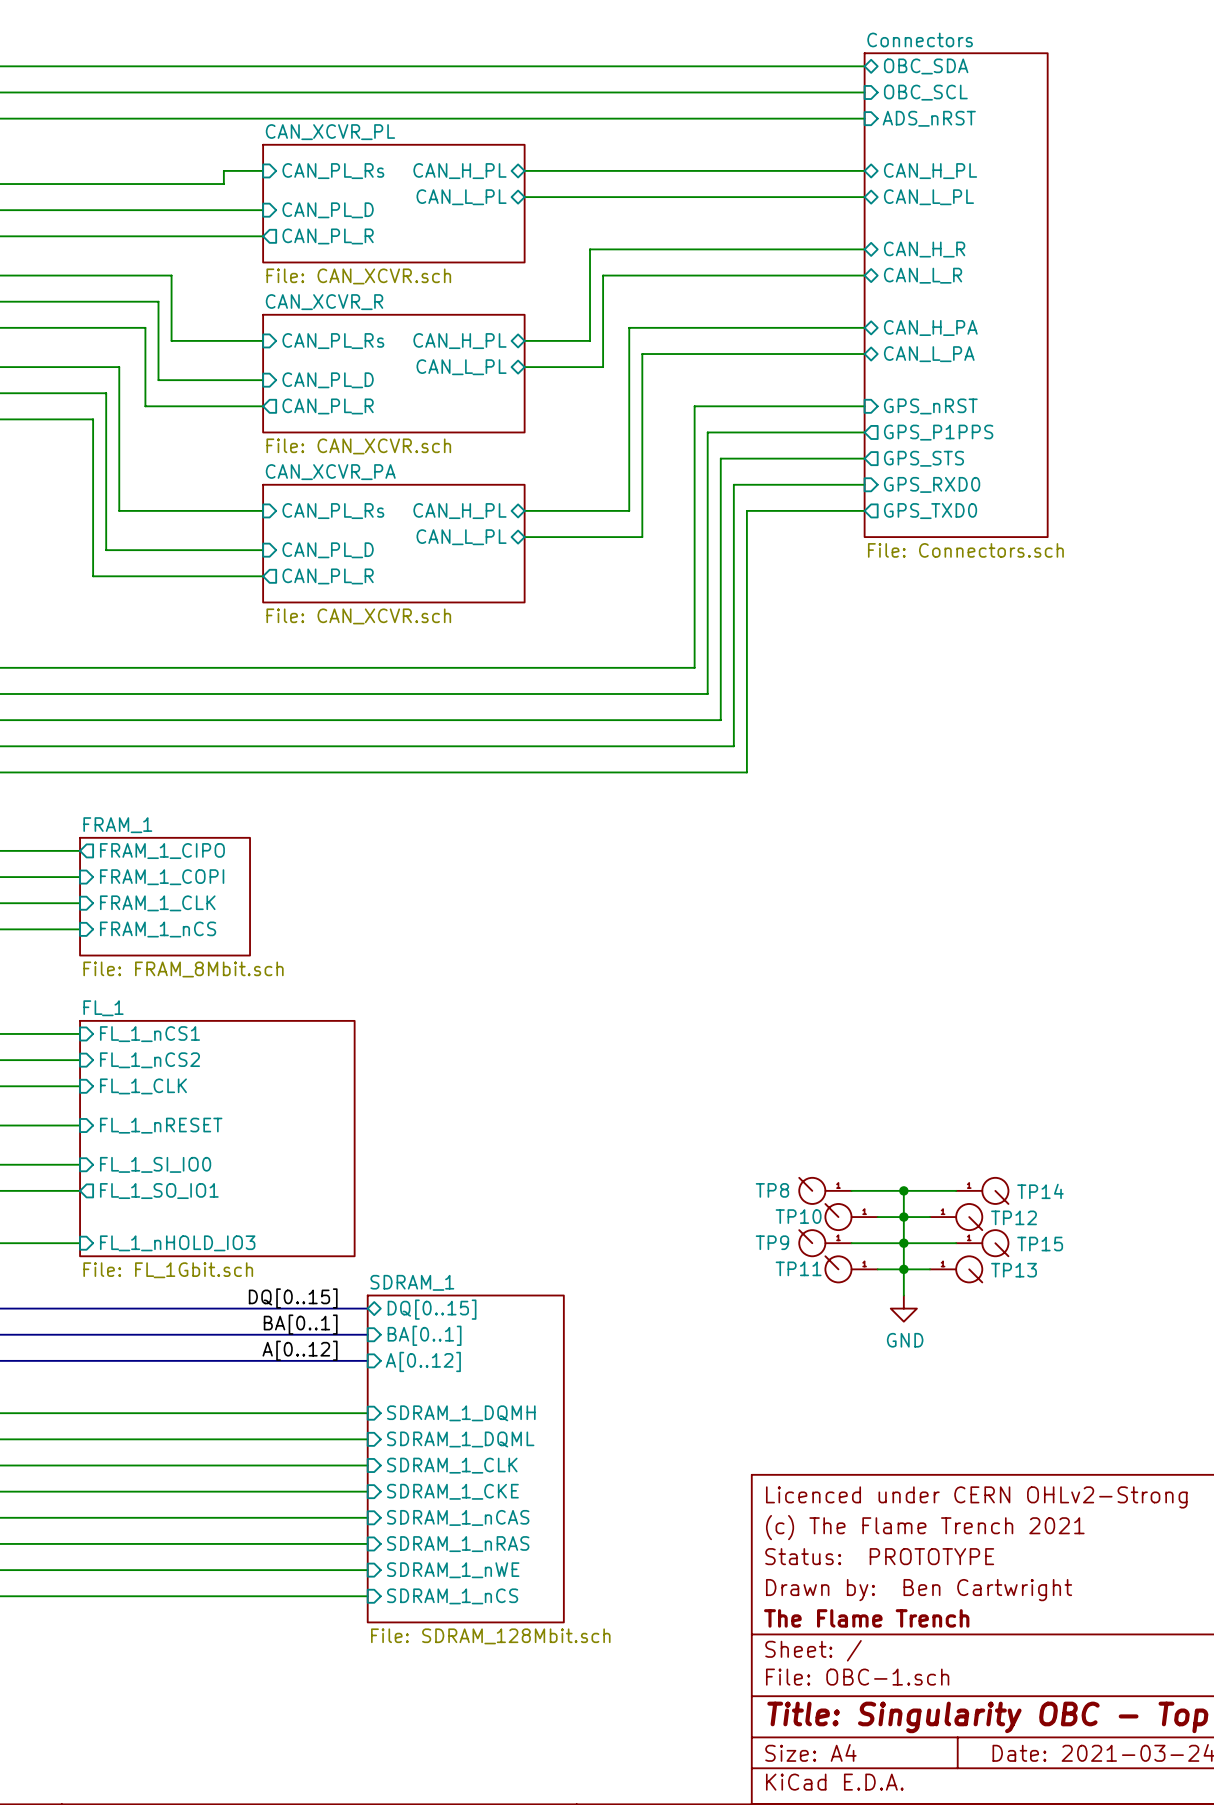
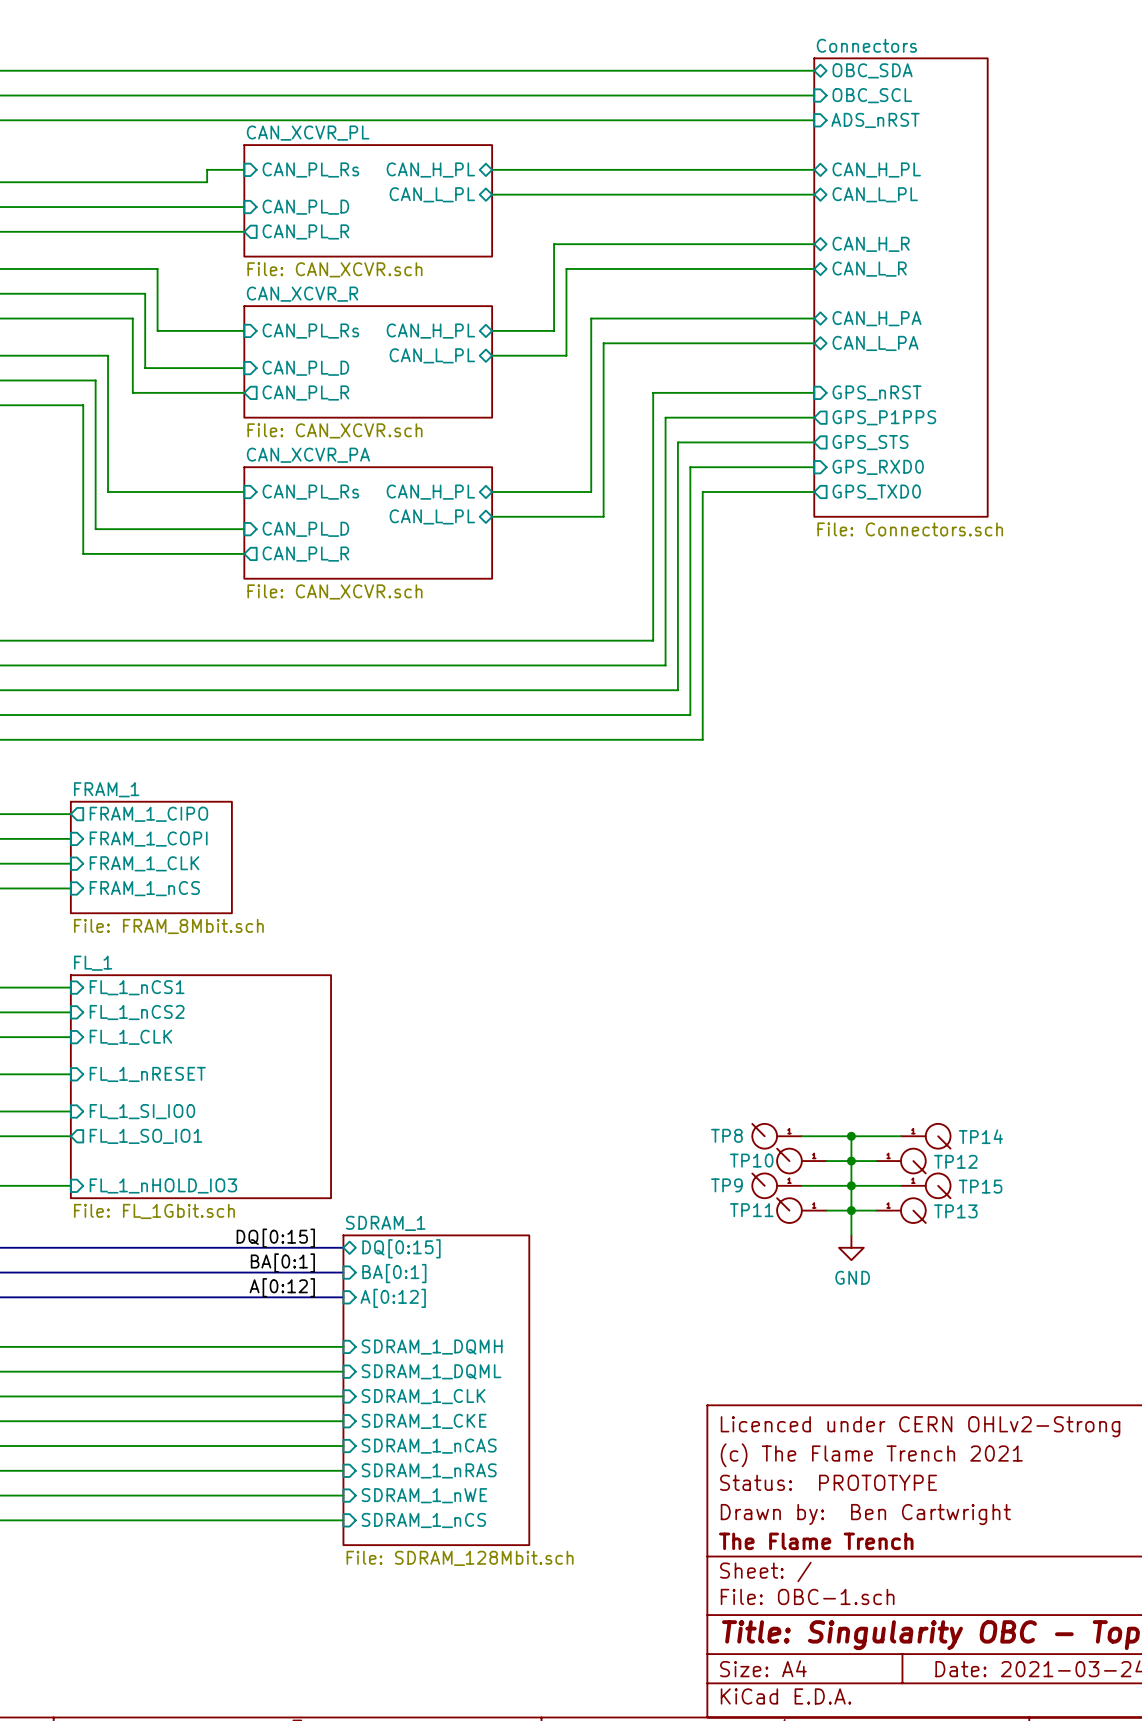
label: DQ[0..15] (293, 1298) -> DQ[0:15] (275, 1238)
sheet pin: DQ[0..15] (432, 1309) -> DQ[0:15] (401, 1248)
label: BA[0..1] (300, 1324) -> BA[0:1] (282, 1262)
sheet pin: BA[0..1] (424, 1335) -> BA[0:1] (394, 1273)
label: A[0..12] (300, 1350) -> A[0:12] (282, 1287)
sheet pin: A[0..12] (423, 1361) -> A[0:12] (393, 1298)

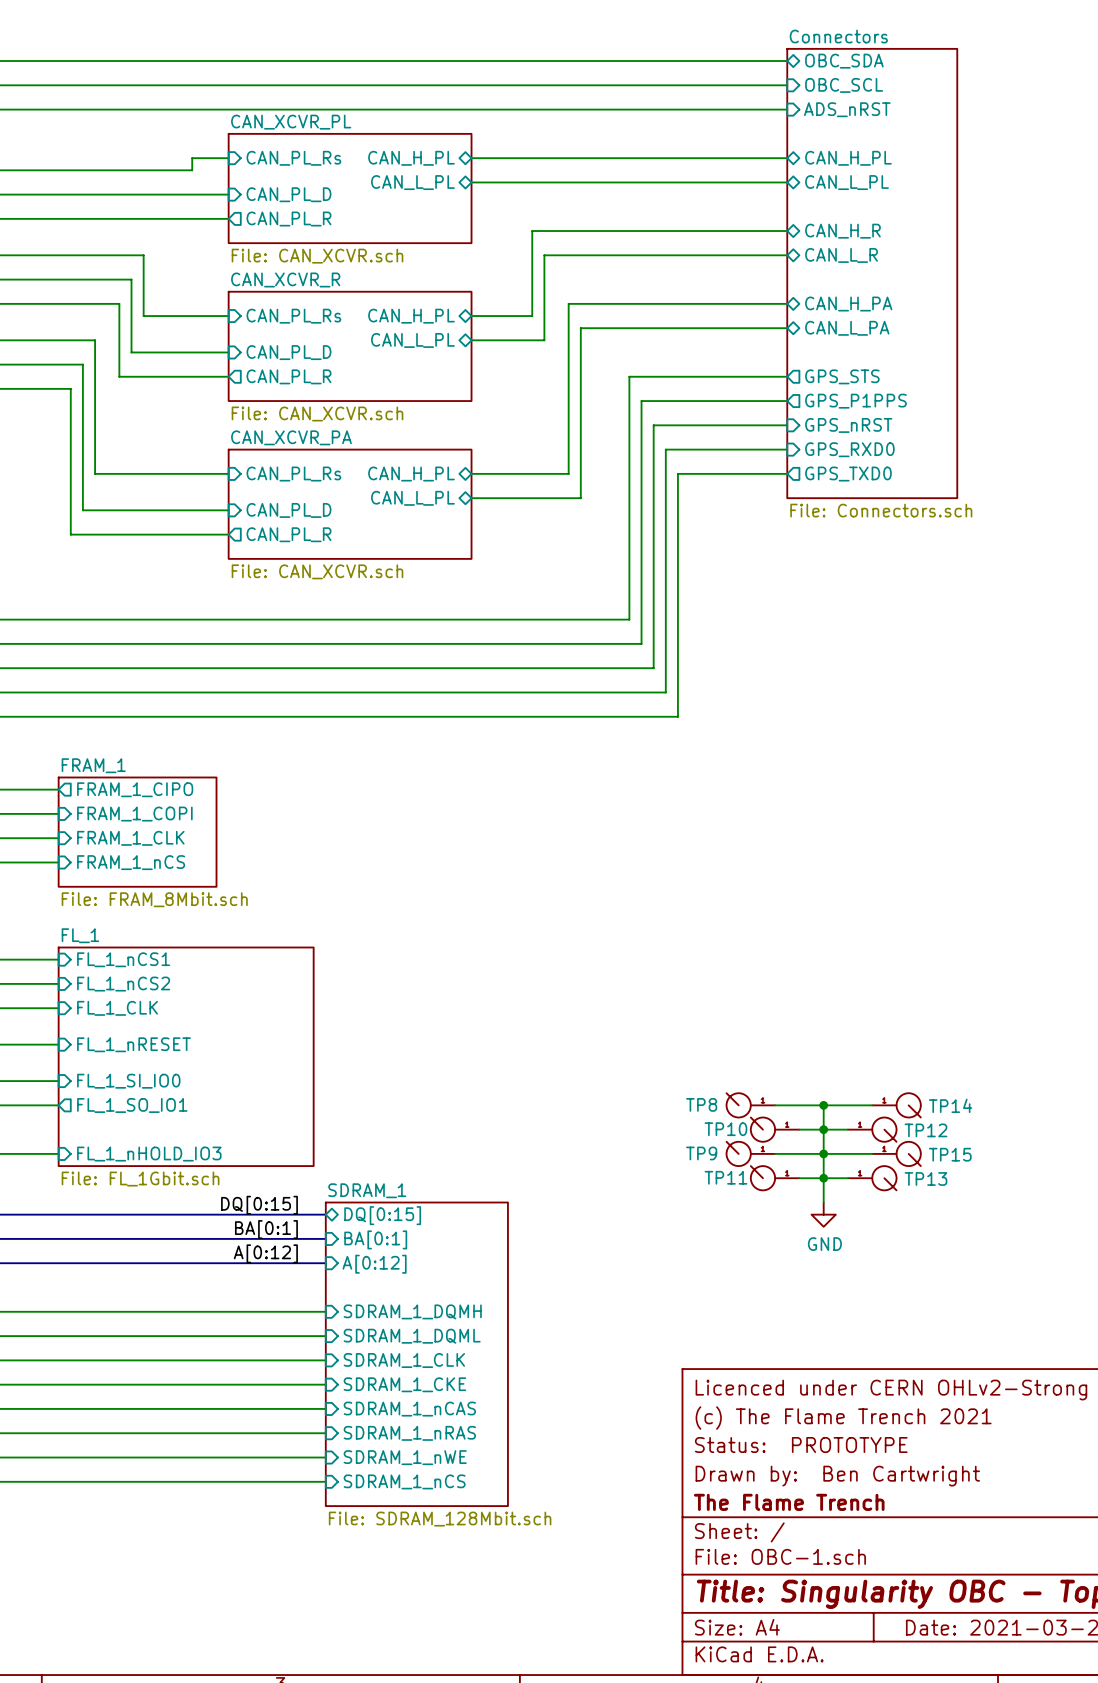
sheet pin shape: input (876, 393) -> output (842, 376)
sheet pin: GPS_nRST (876, 393) -> GPS_STS (842, 376)
sheet pin shape: output (870, 442) -> input (848, 425)
sheet pin: GPS_STS (870, 442) -> GPS_nRST (848, 425)

